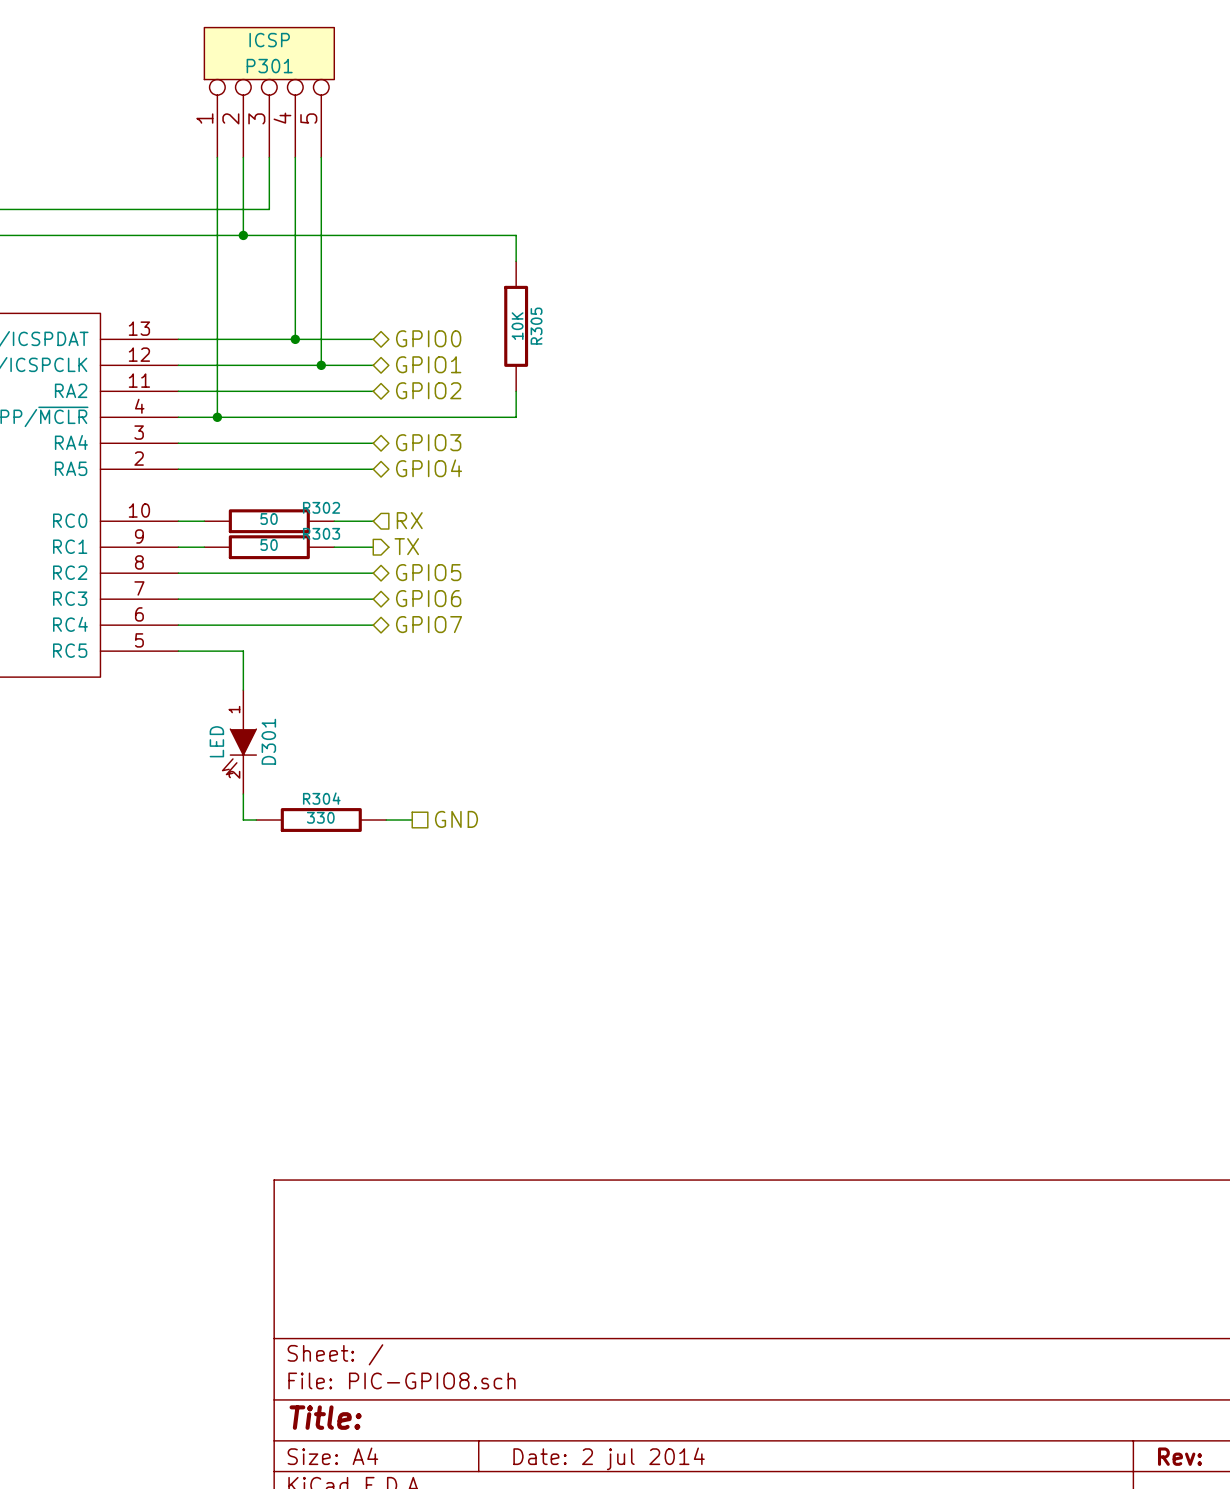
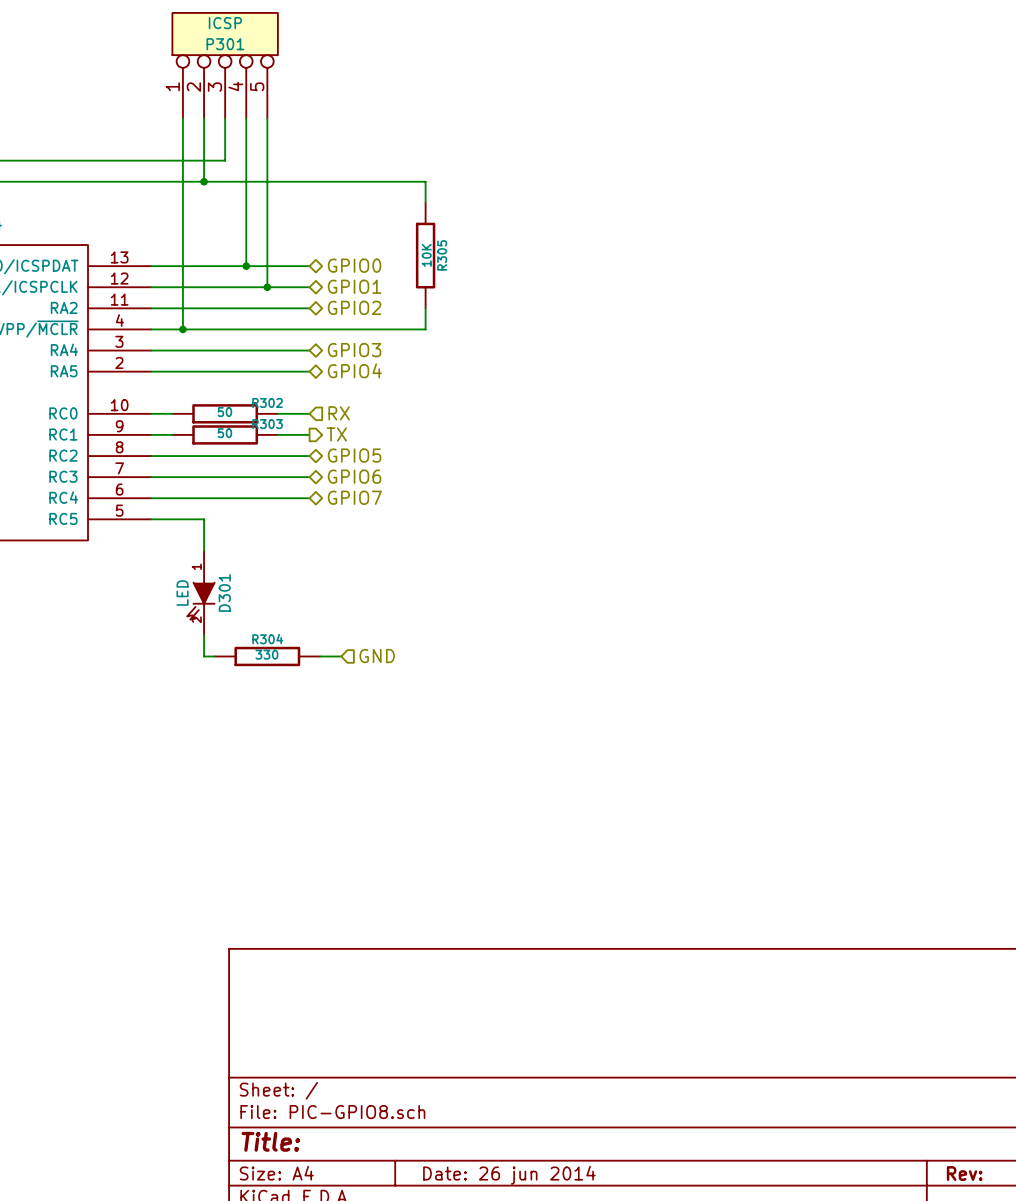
hierarchical label shape: passive (456, 819) -> input (377, 656)
title block: Date: 2 jul 2014 (609, 1458) -> Date: 26 jun 2014 (509, 1175)

